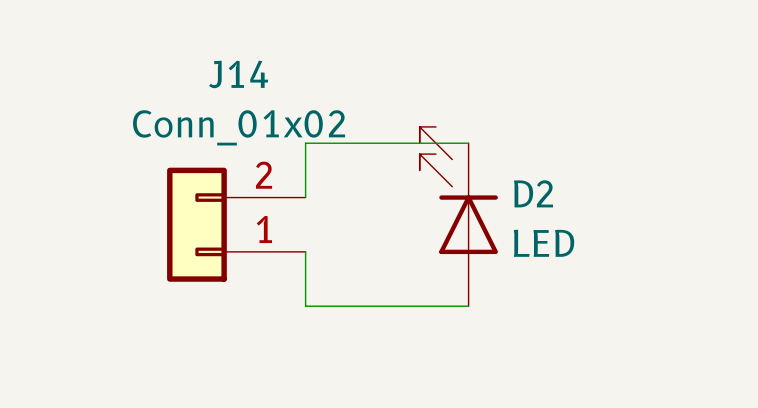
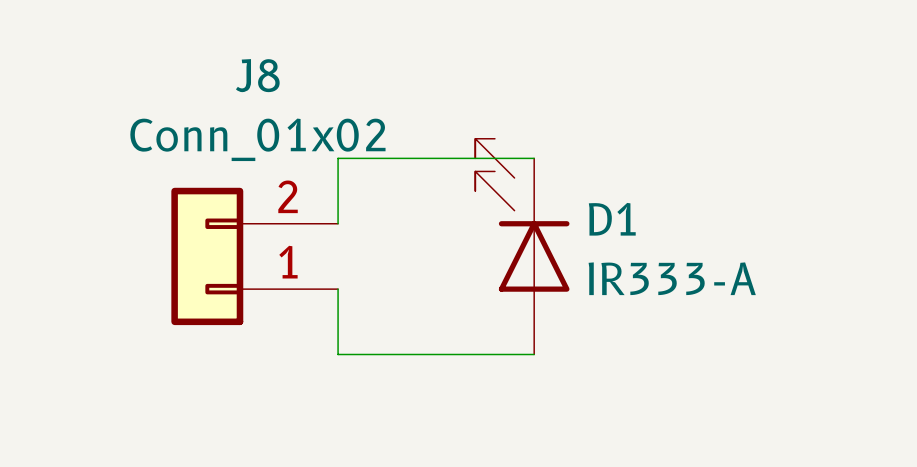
J14 name: J14 (238, 74) -> J8 (257, 75)
D2 name: D2 (533, 193) -> D1 (612, 219)
D2 value: LED (544, 243) -> IR333-A (672, 278)

